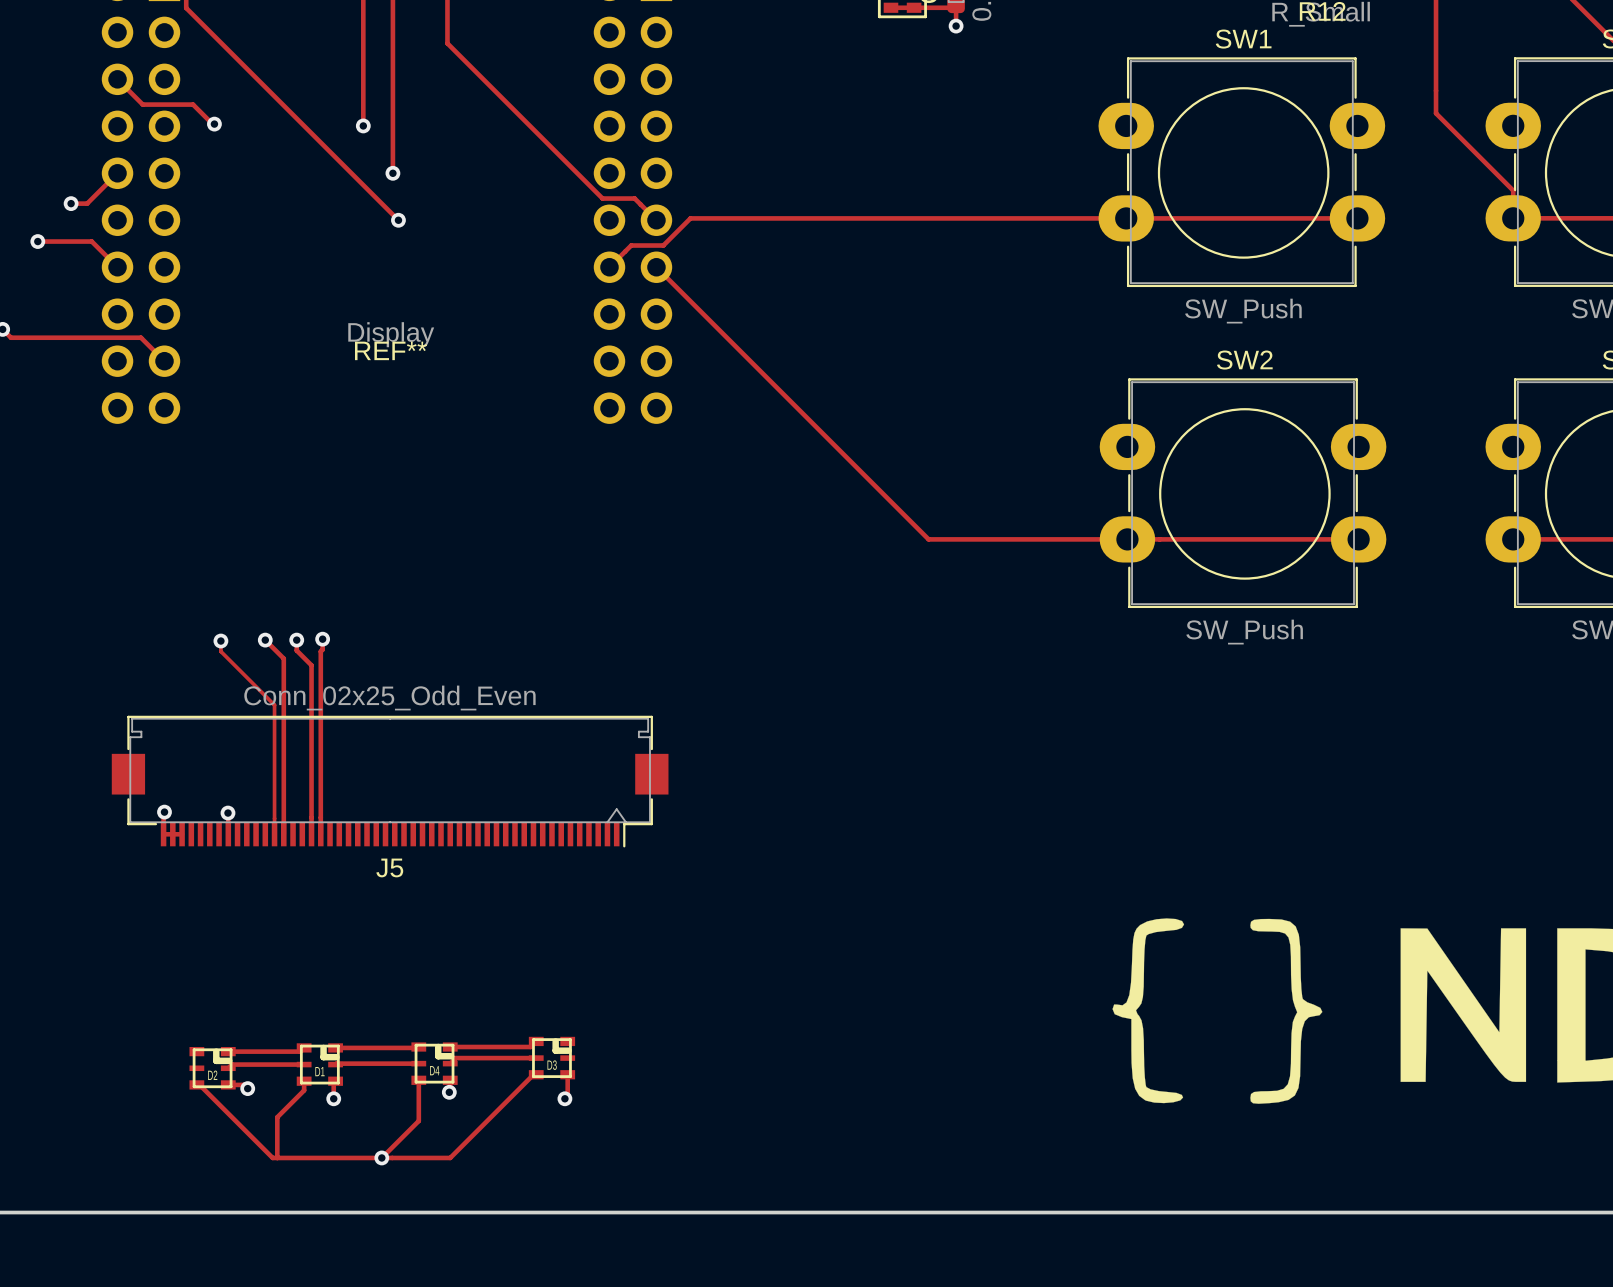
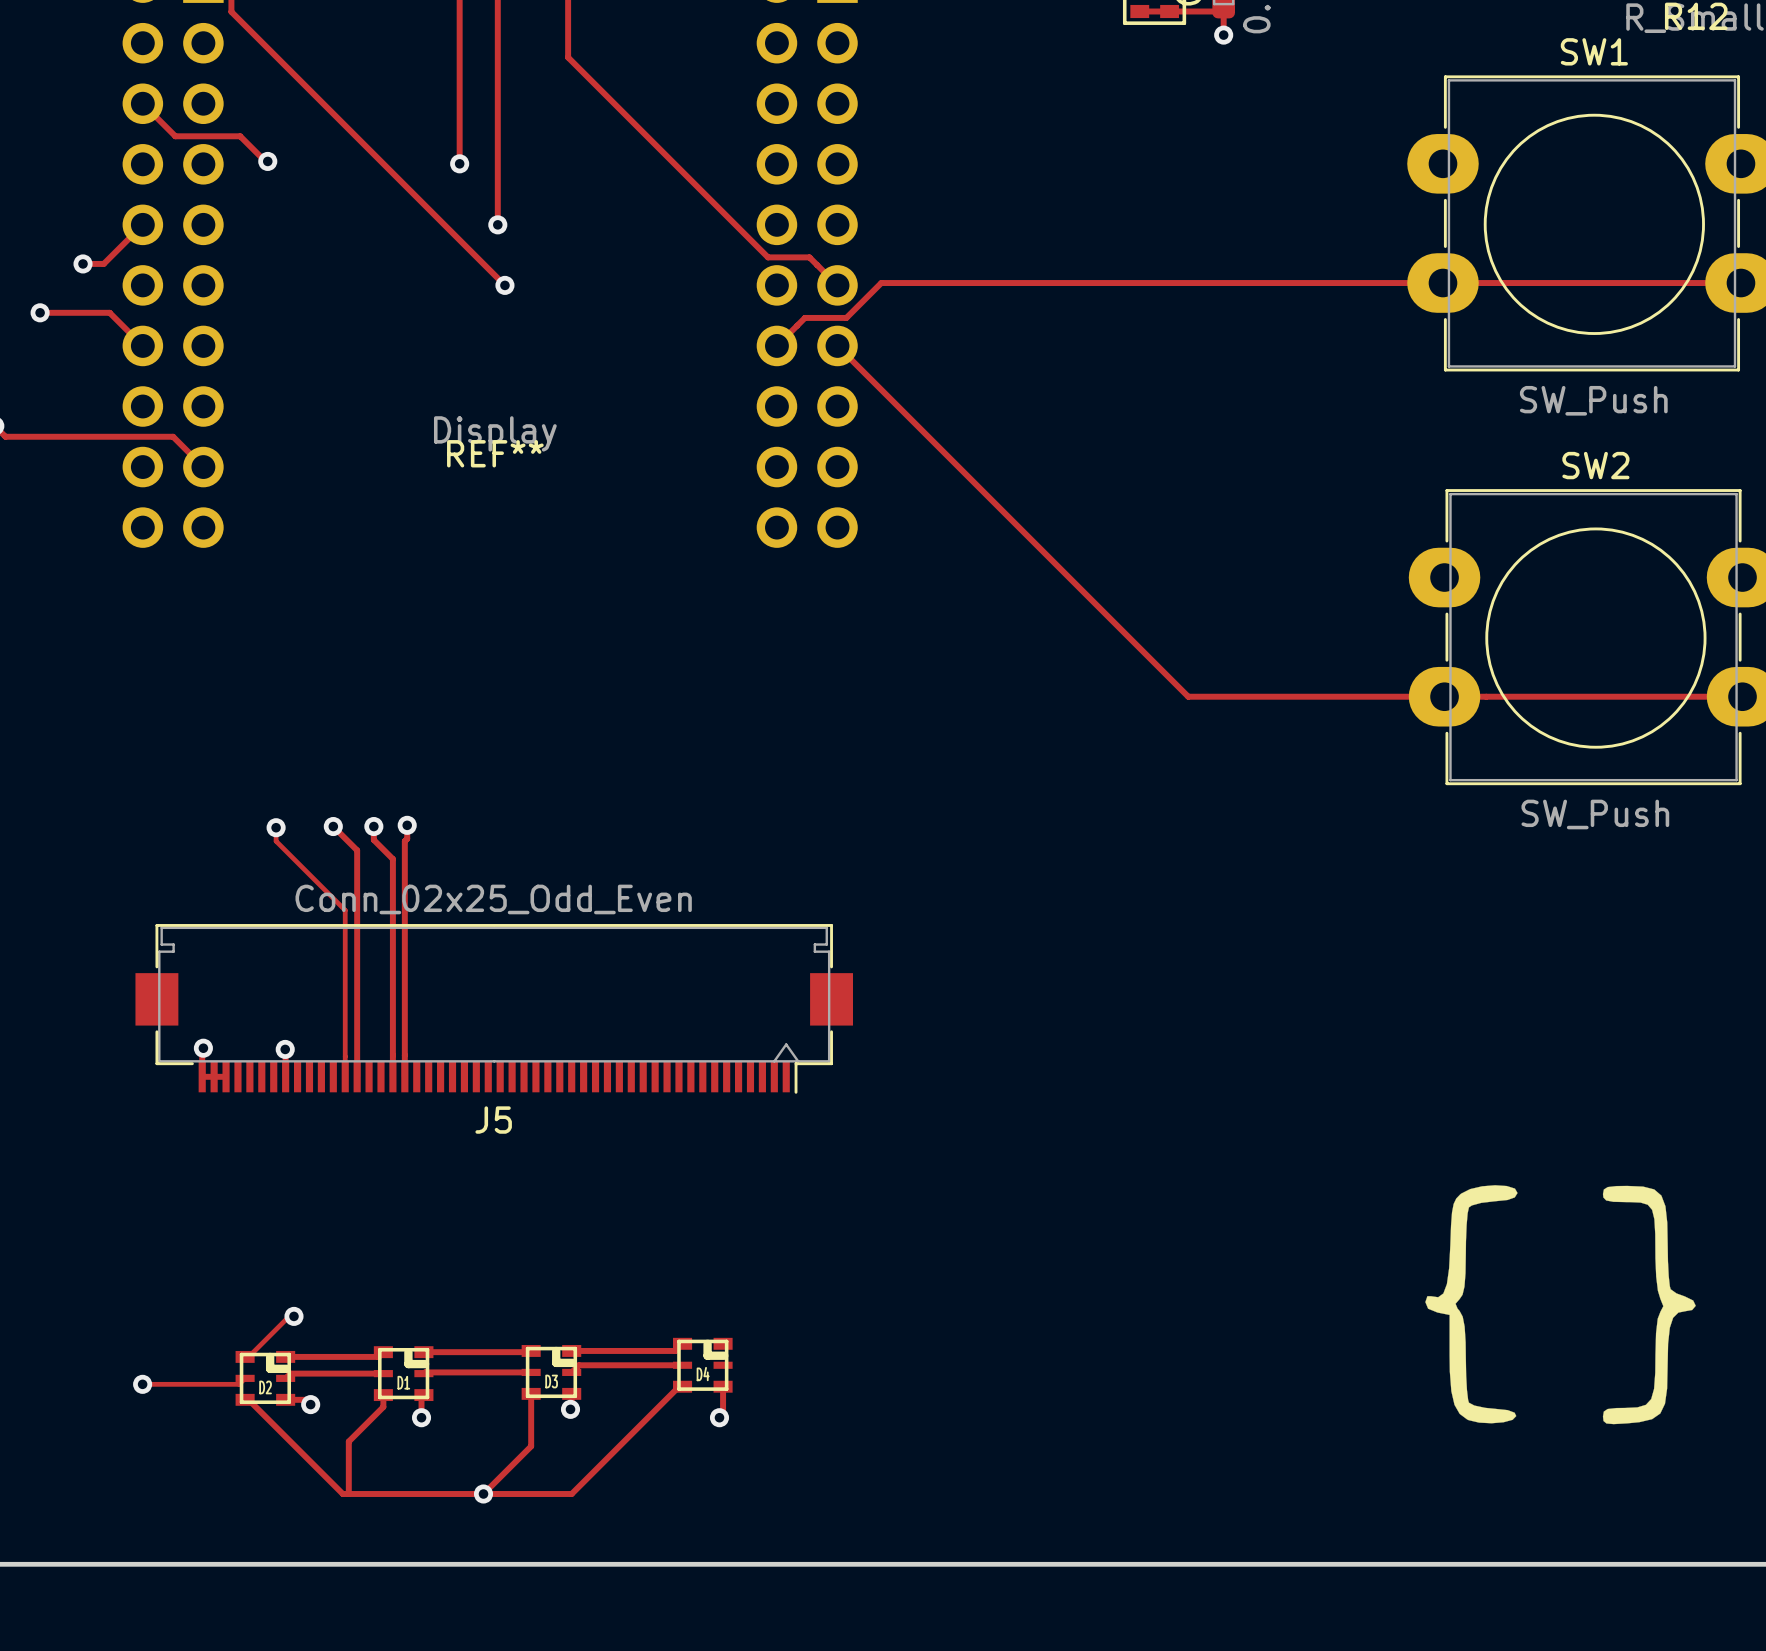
track: none -> (293, 1316) (289, 1316) (248, 1356) (245, 1356)
via: none -> (293, 1316)
D3 name: D3 (552, 1065) -> D4 (703, 1374)
track: none -> (245, 1378) (239, 1384) (142, 1384)
D4 name: D4 (434, 1070) -> D3 (551, 1381)
via: none -> (142, 1384)

